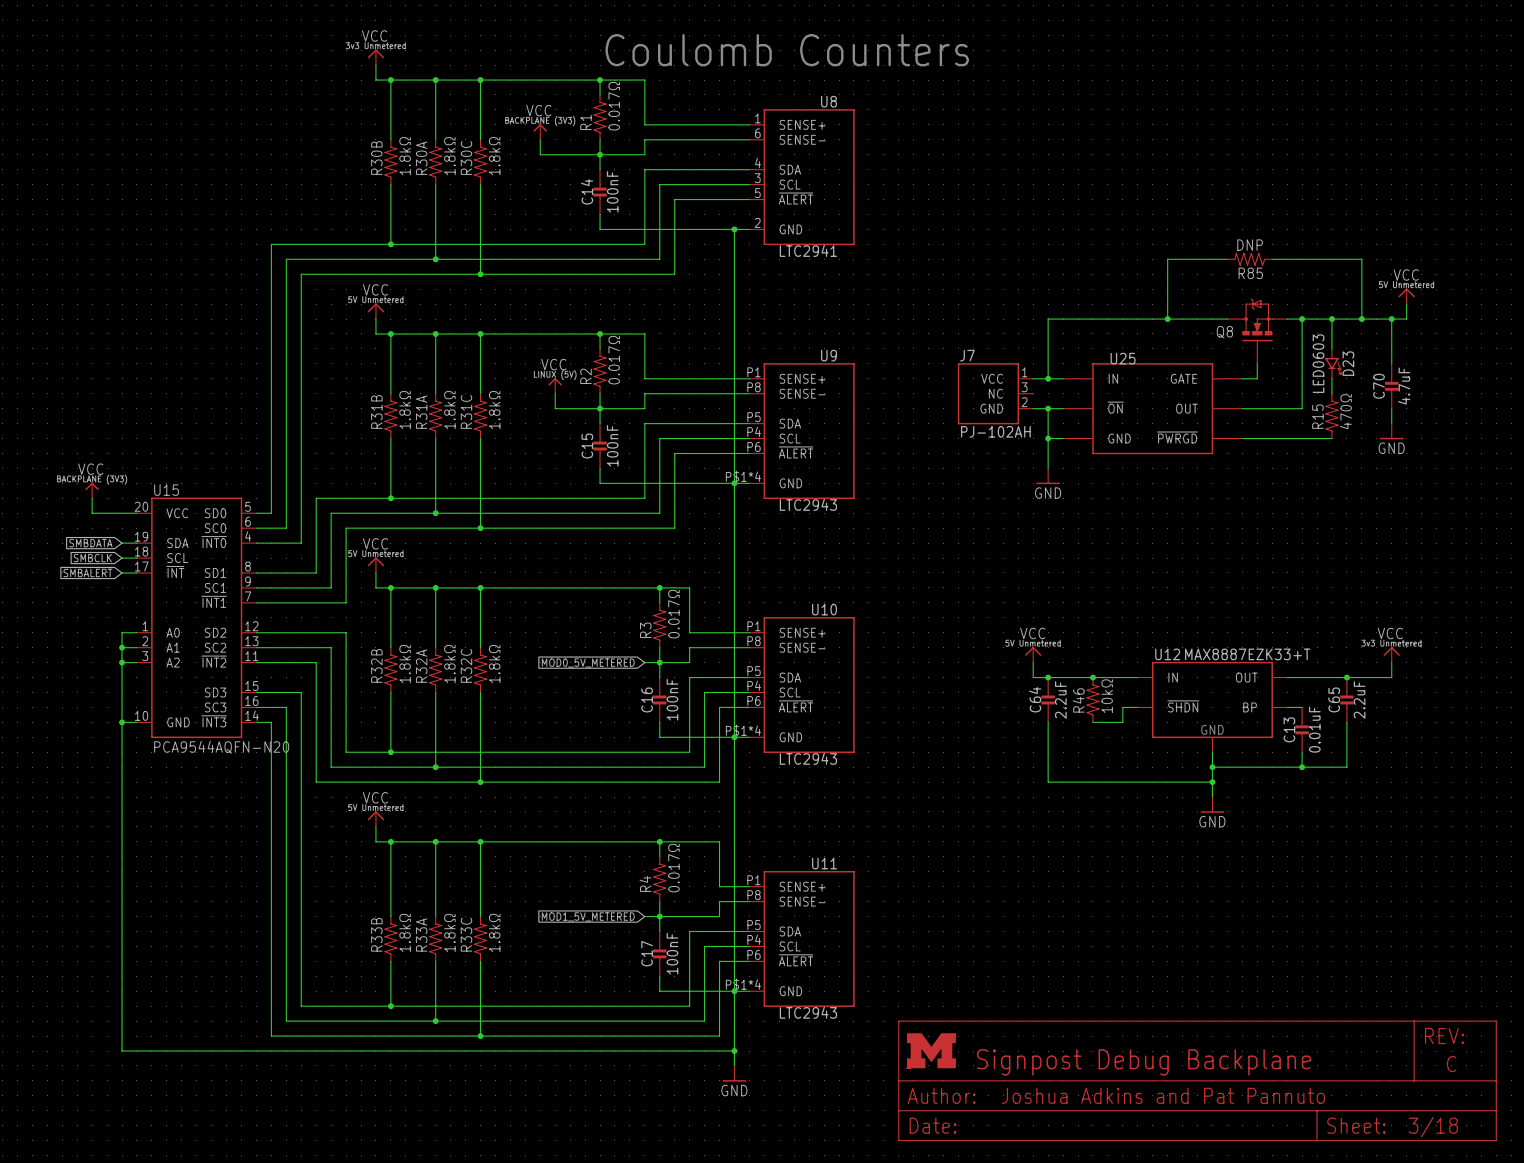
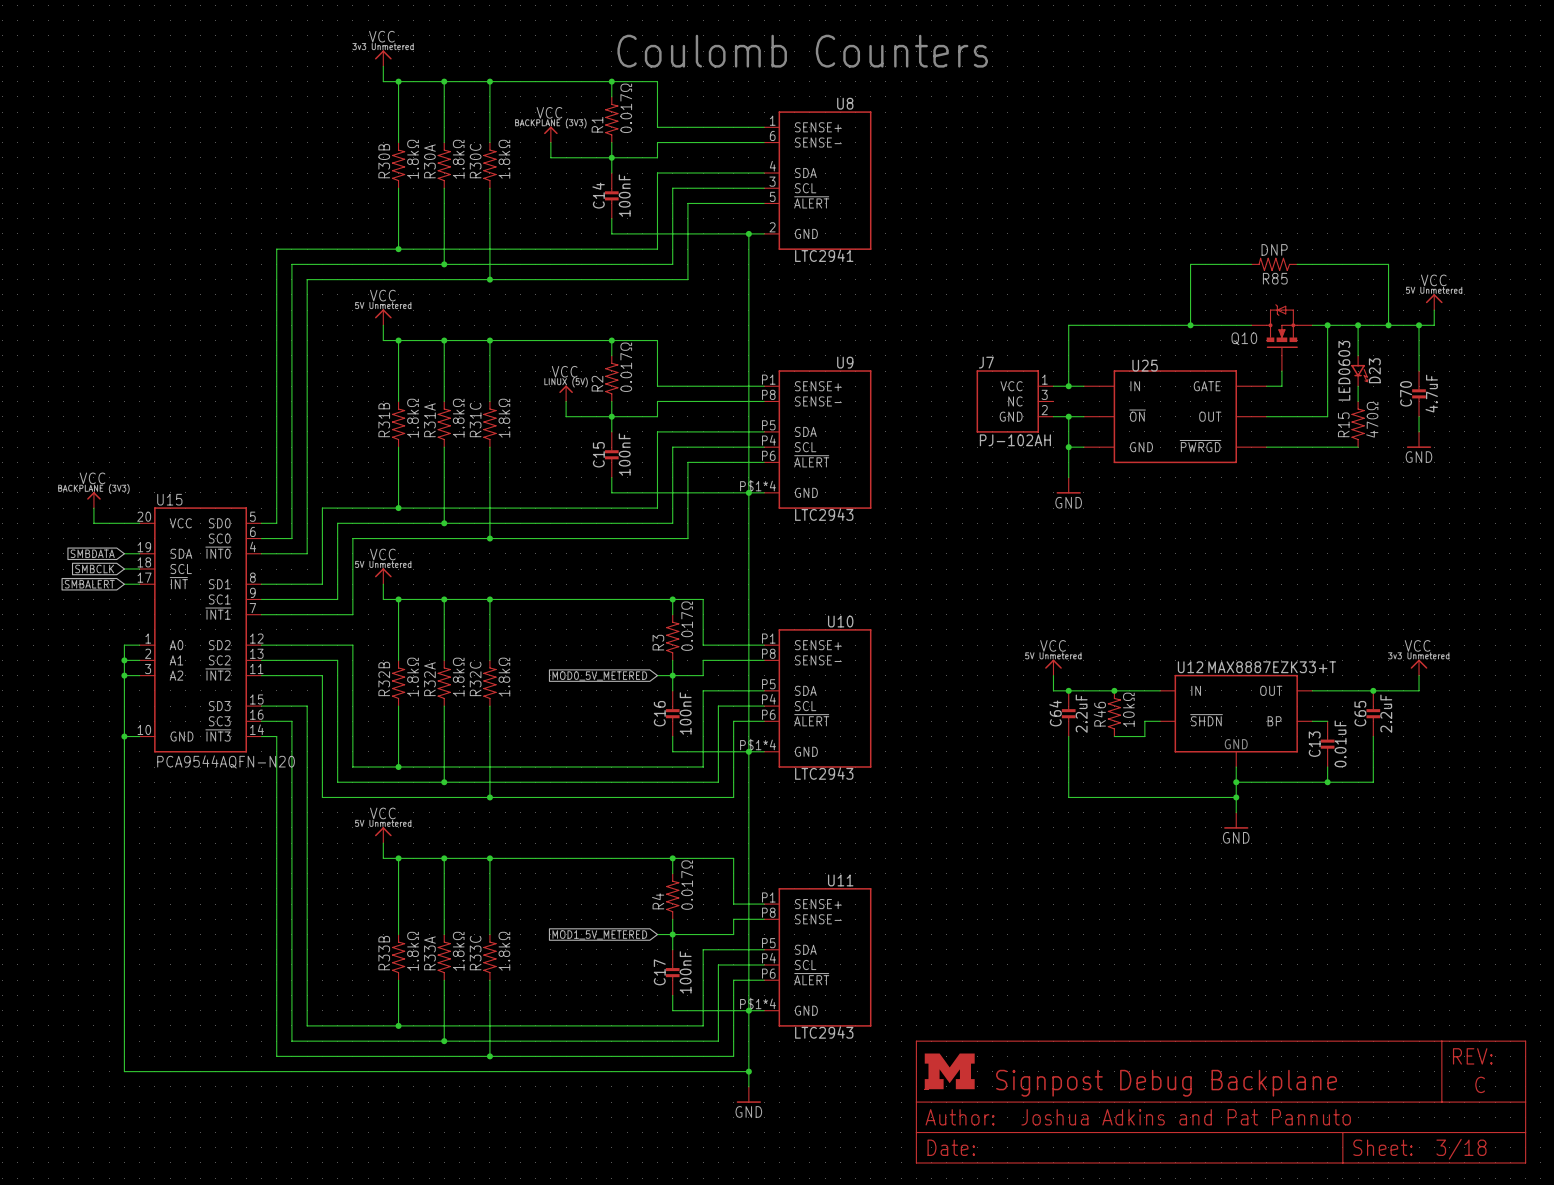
Q8 name: Q8 (1224, 332) -> Q10 (1244, 338)

